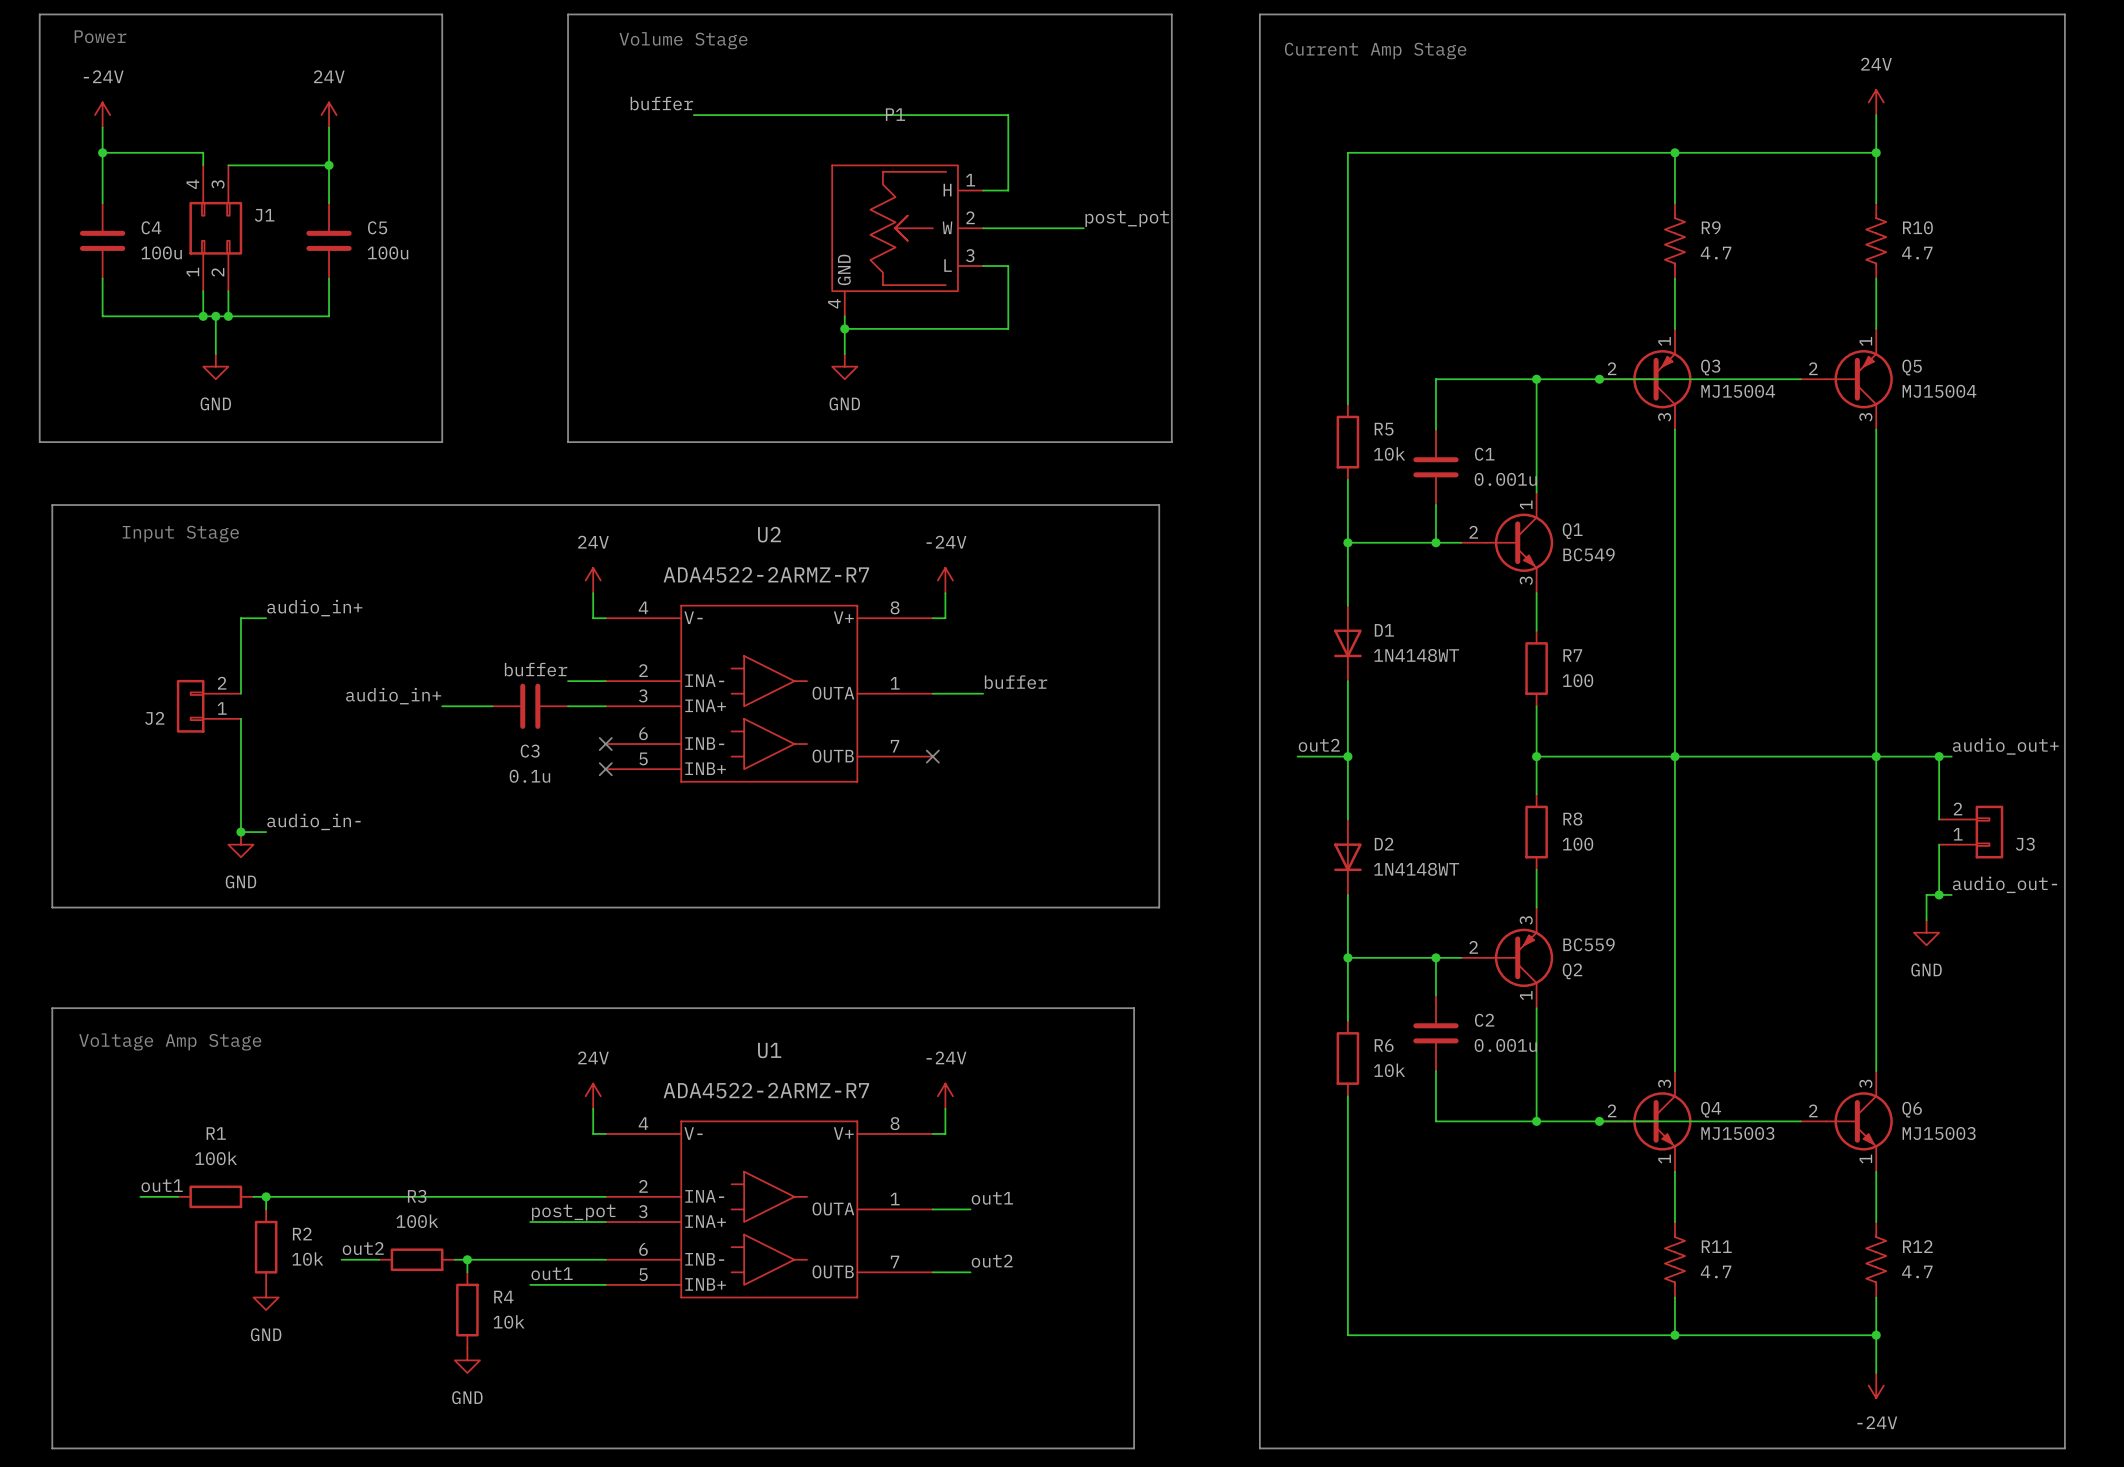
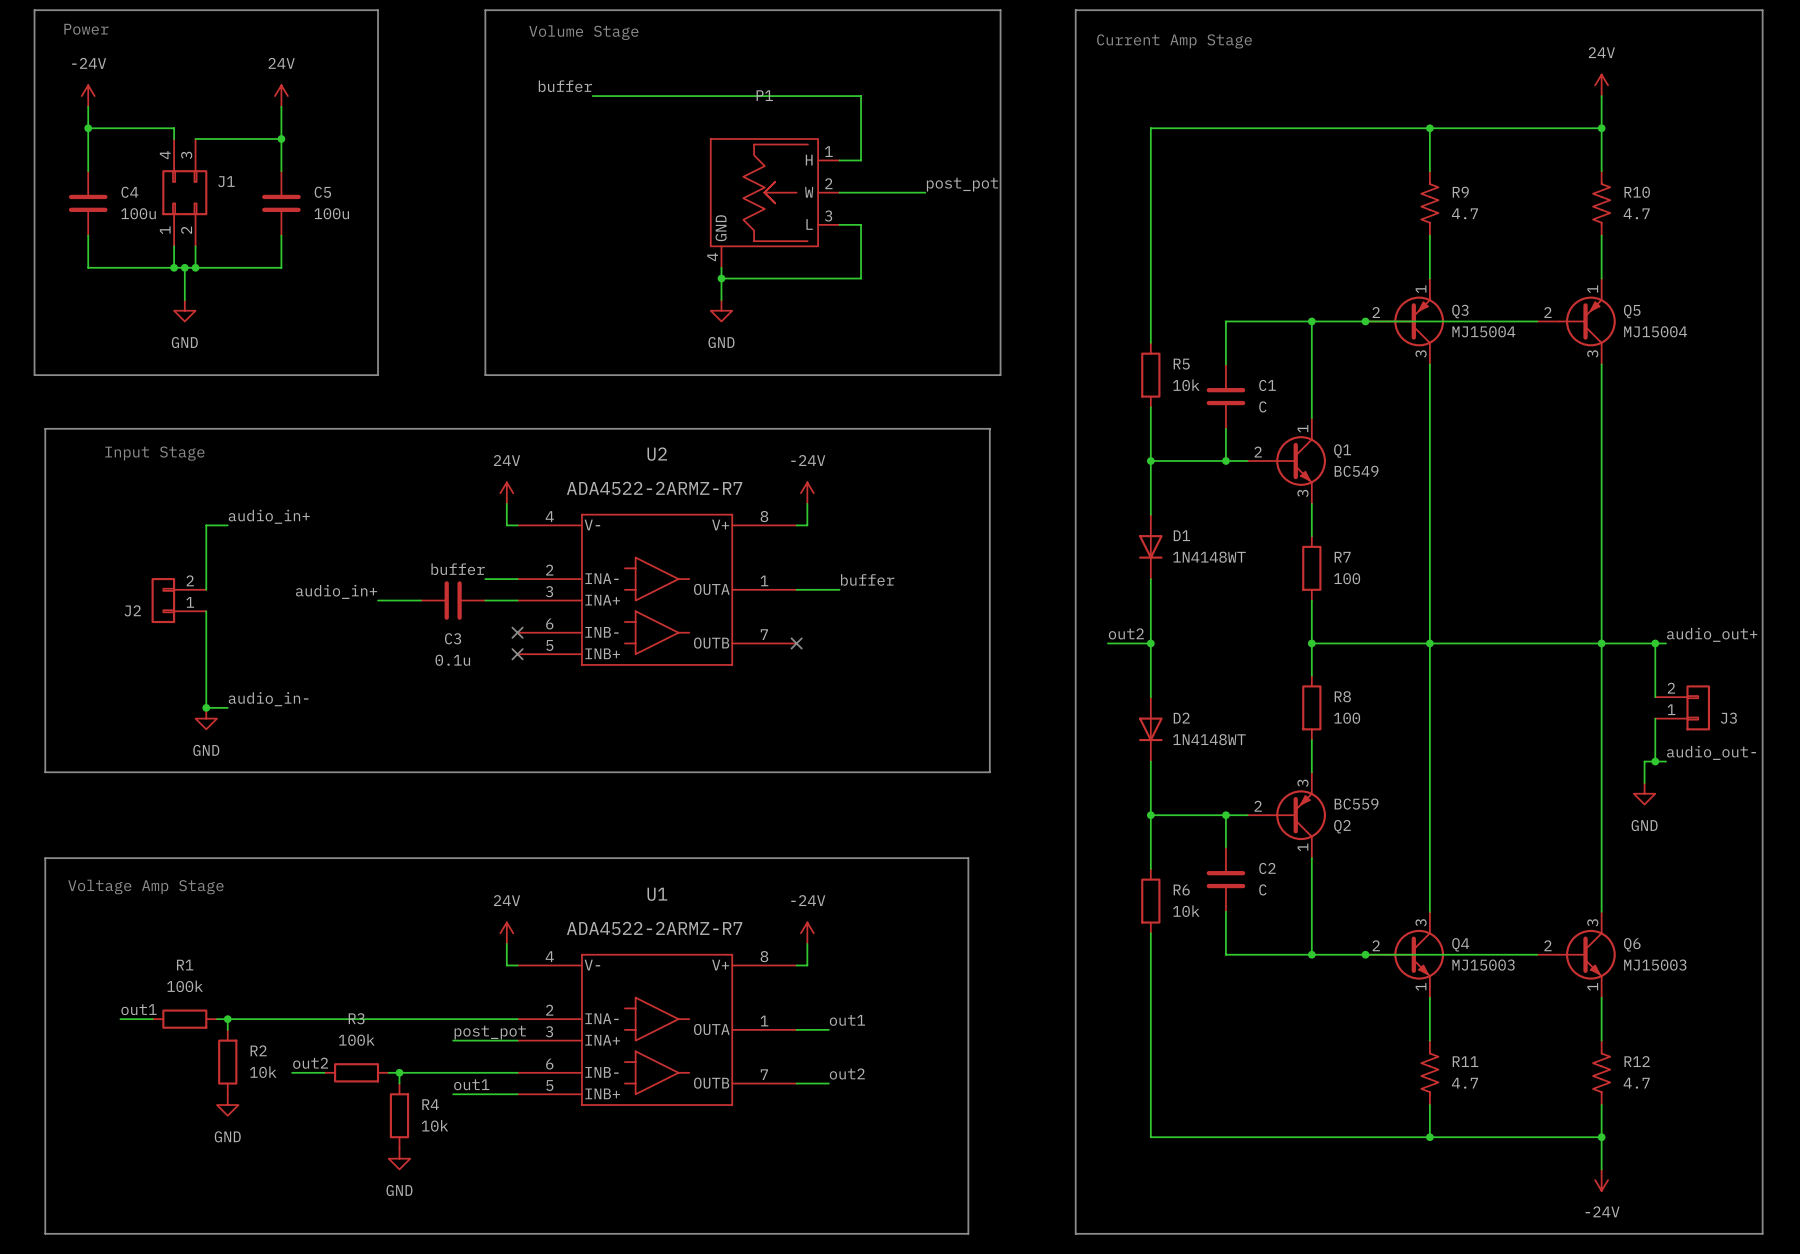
C1 value: 0.001u (1505, 479) -> C (1262, 406)
C2 value: 0.001u (1505, 1045) -> C (1262, 889)

